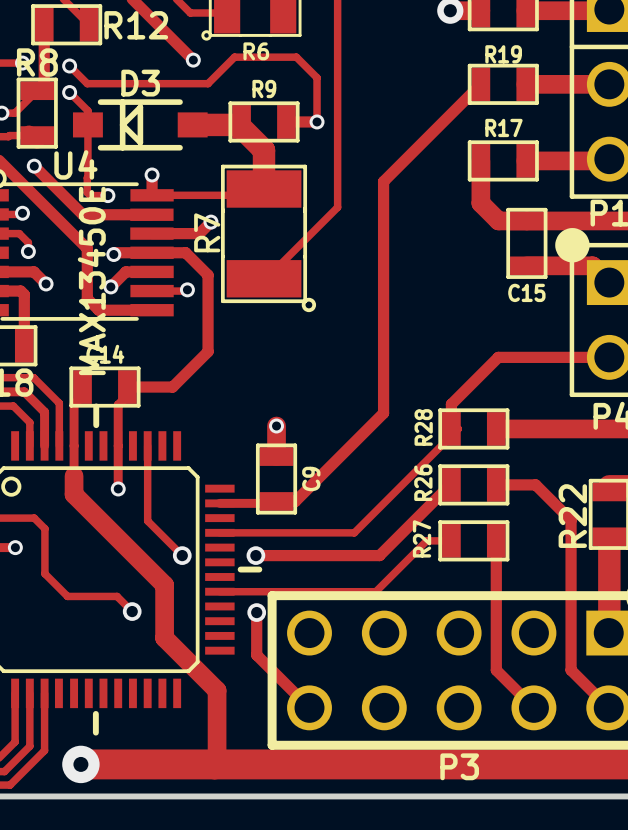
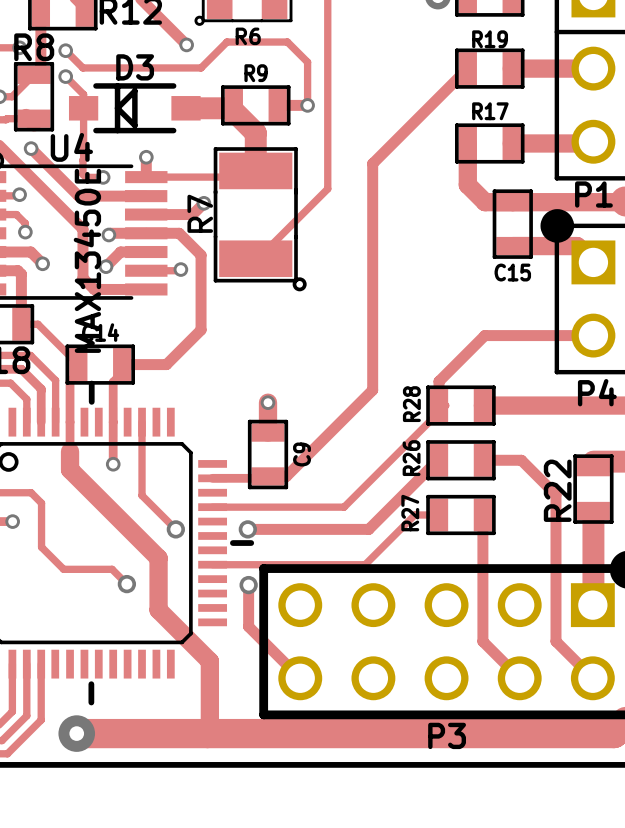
track: none -> (21, 324) (37, 324) (78, 364)

